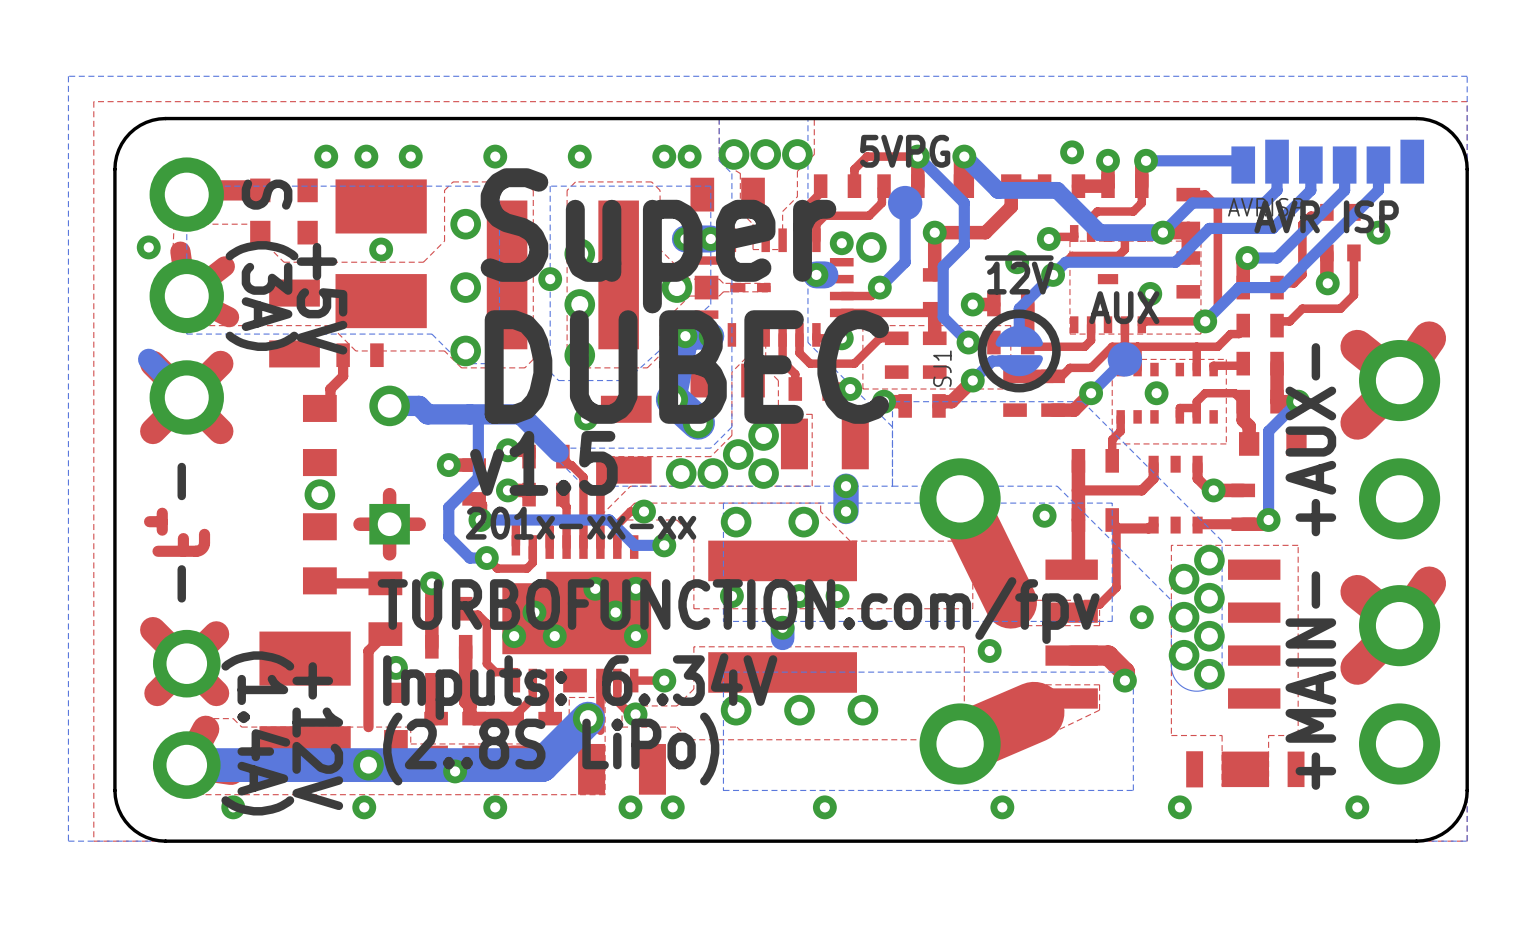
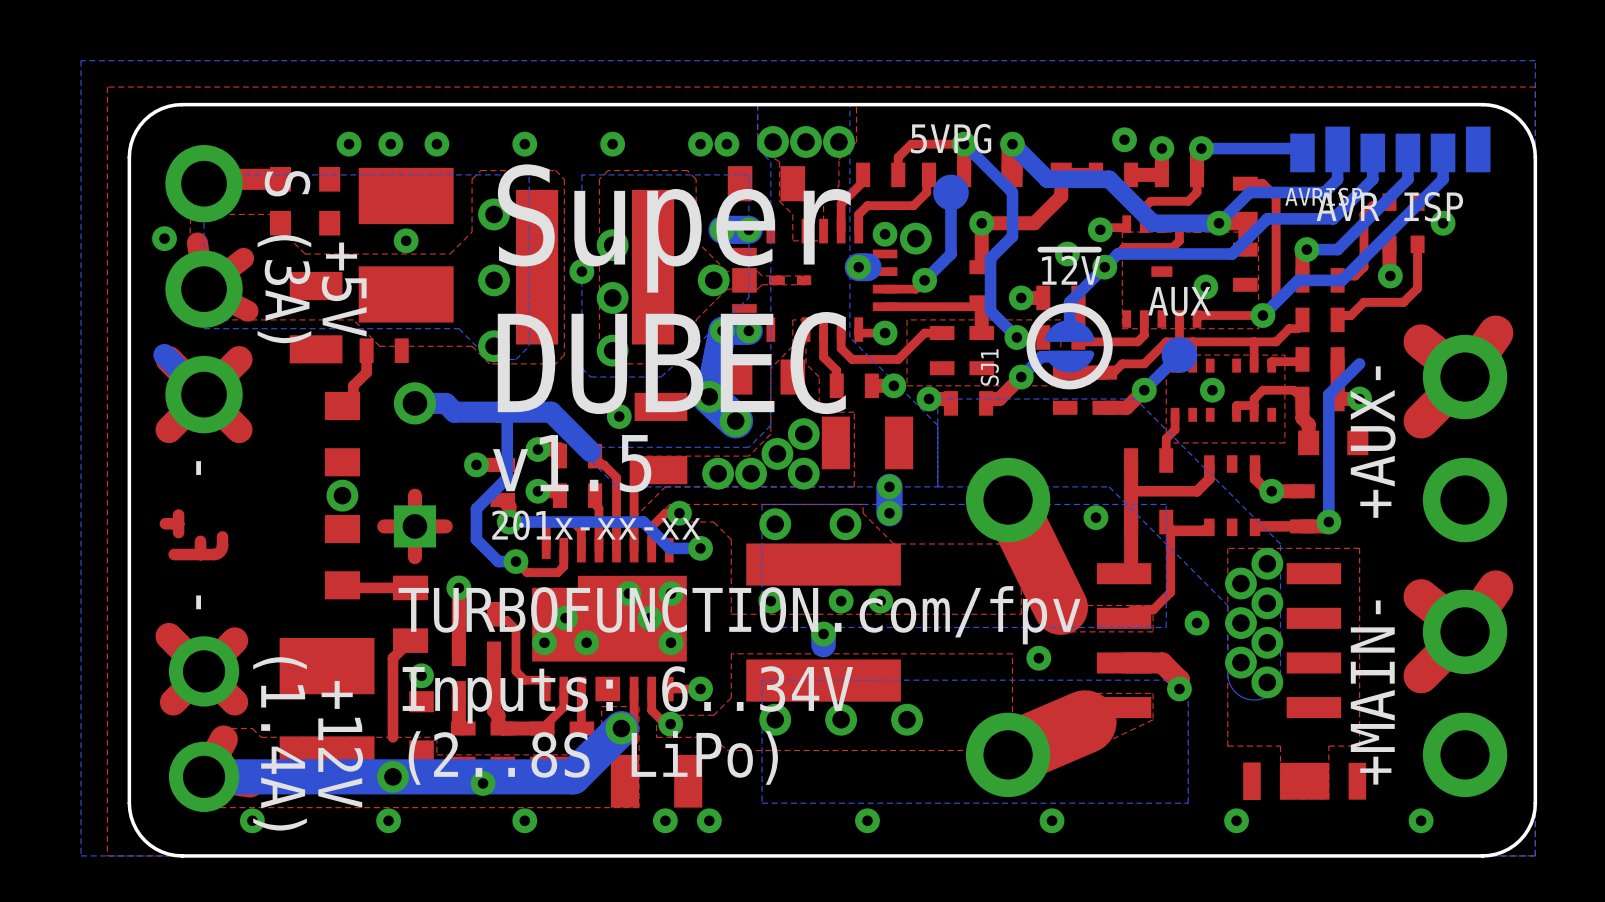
bottom track: (1298, 401) (1268, 431) -> (1359, 363) (1328, 394) (1328, 429)

